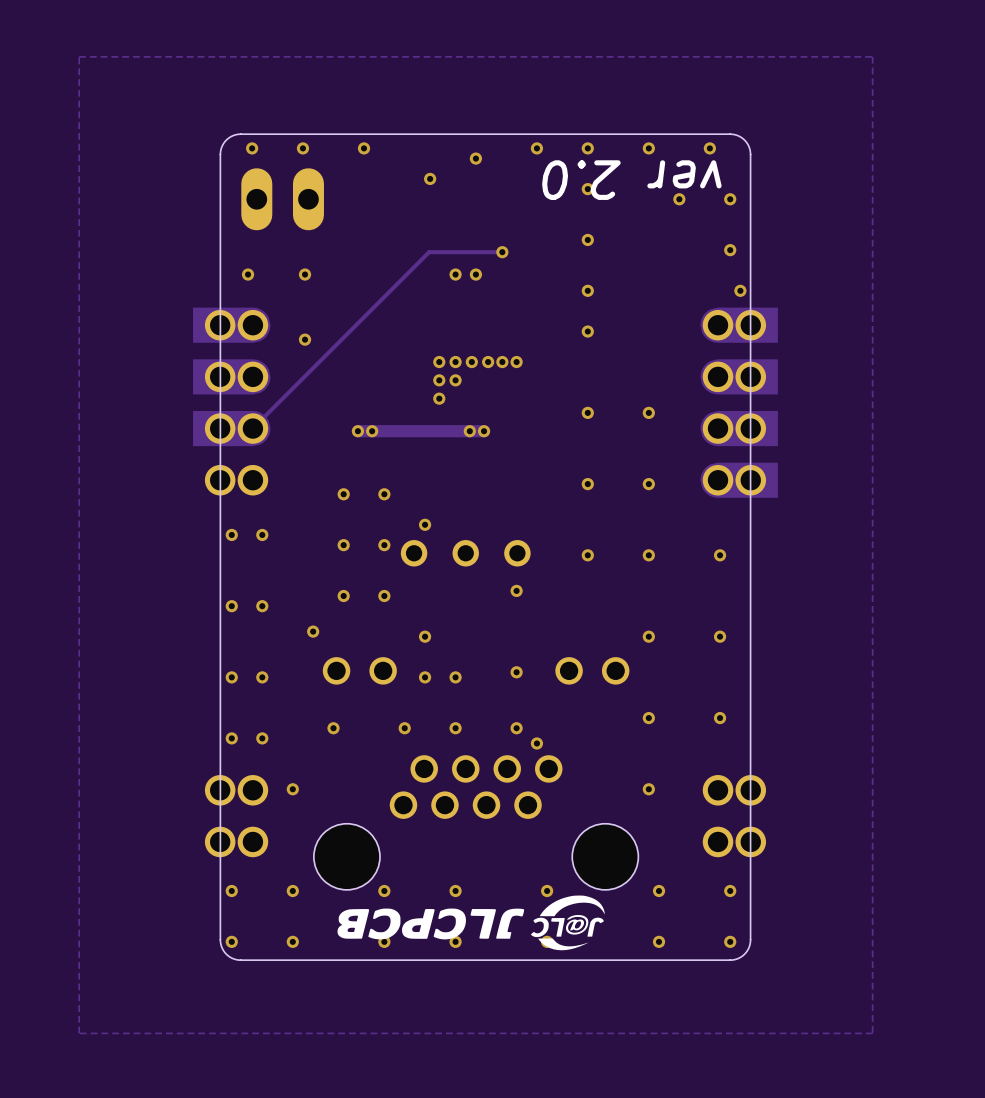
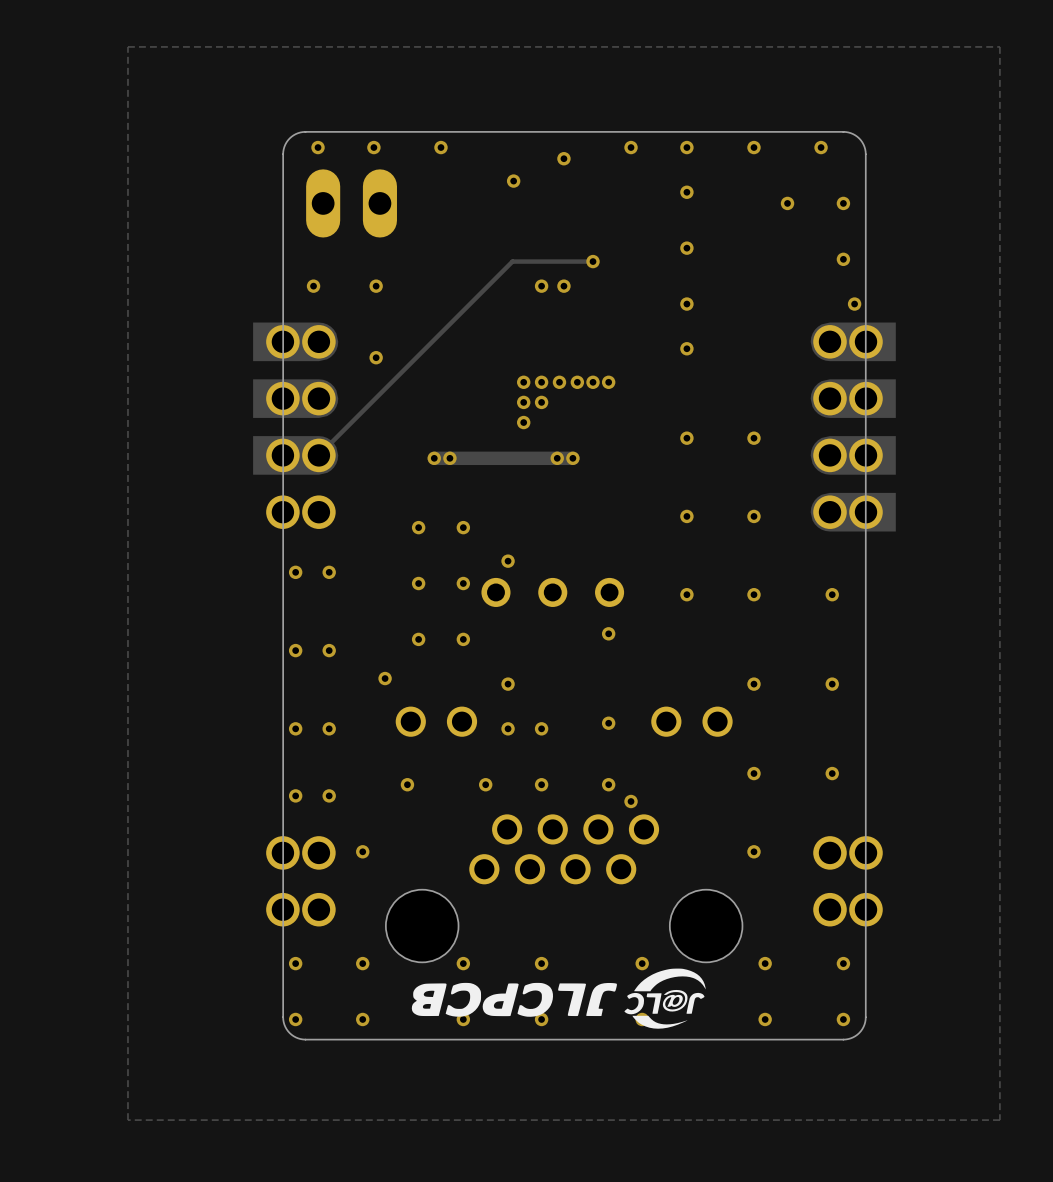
text: ver 2.0 (631, 180) -> none

